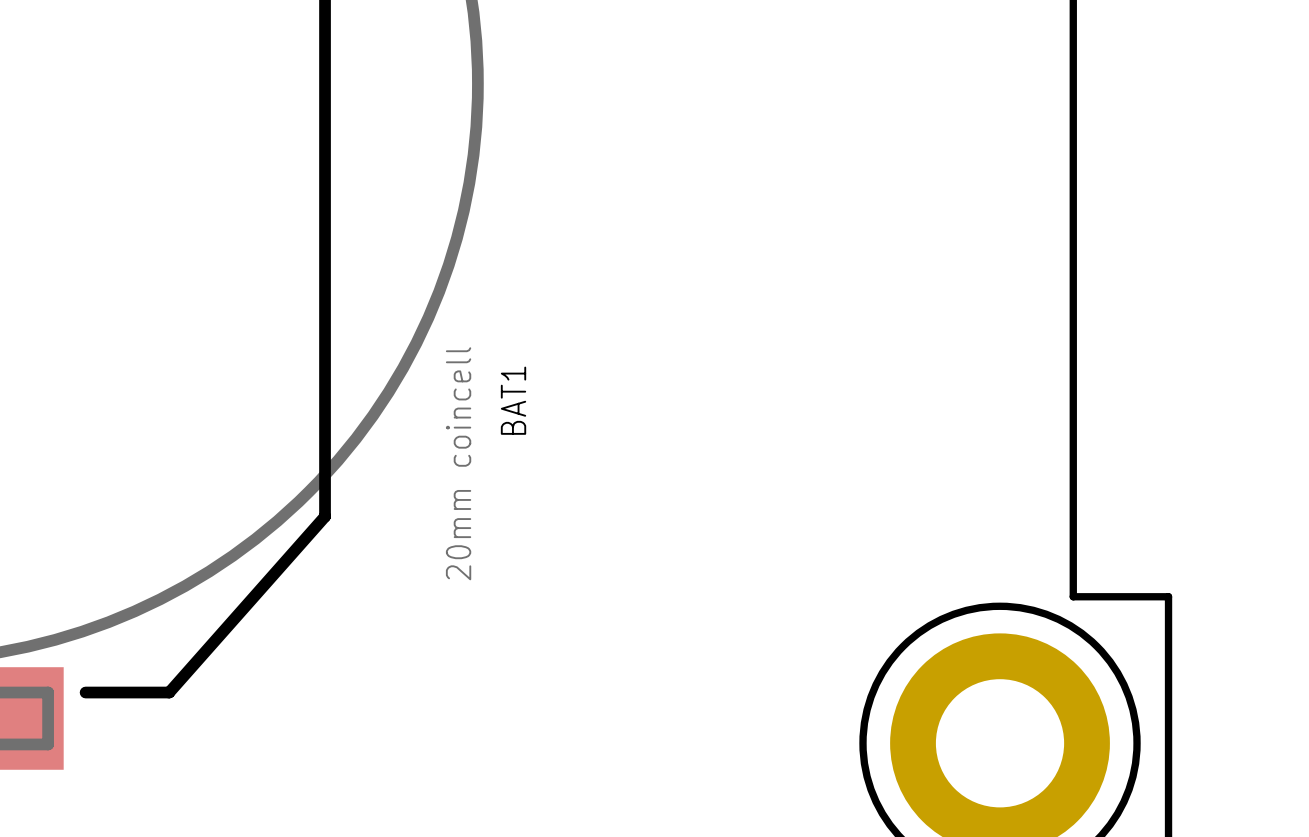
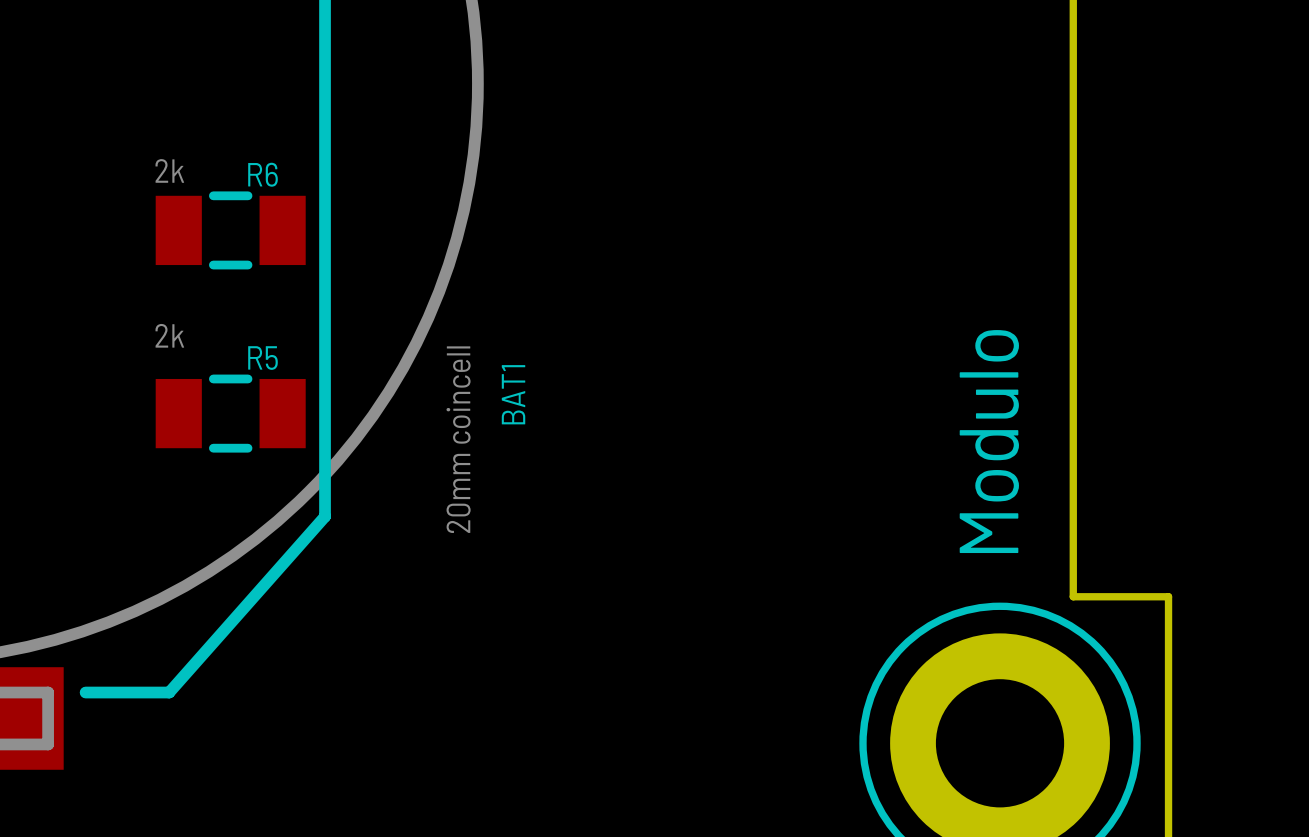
R6: none -> 2k (230, 230)
R5: none -> 2k (230, 413)
text: none -> Modulo (989, 441)

